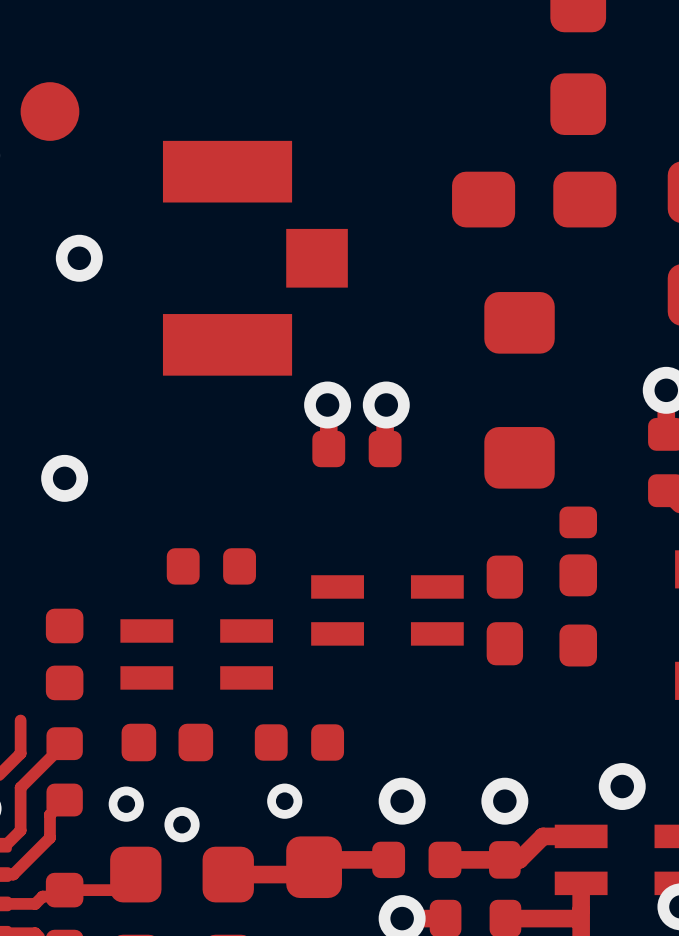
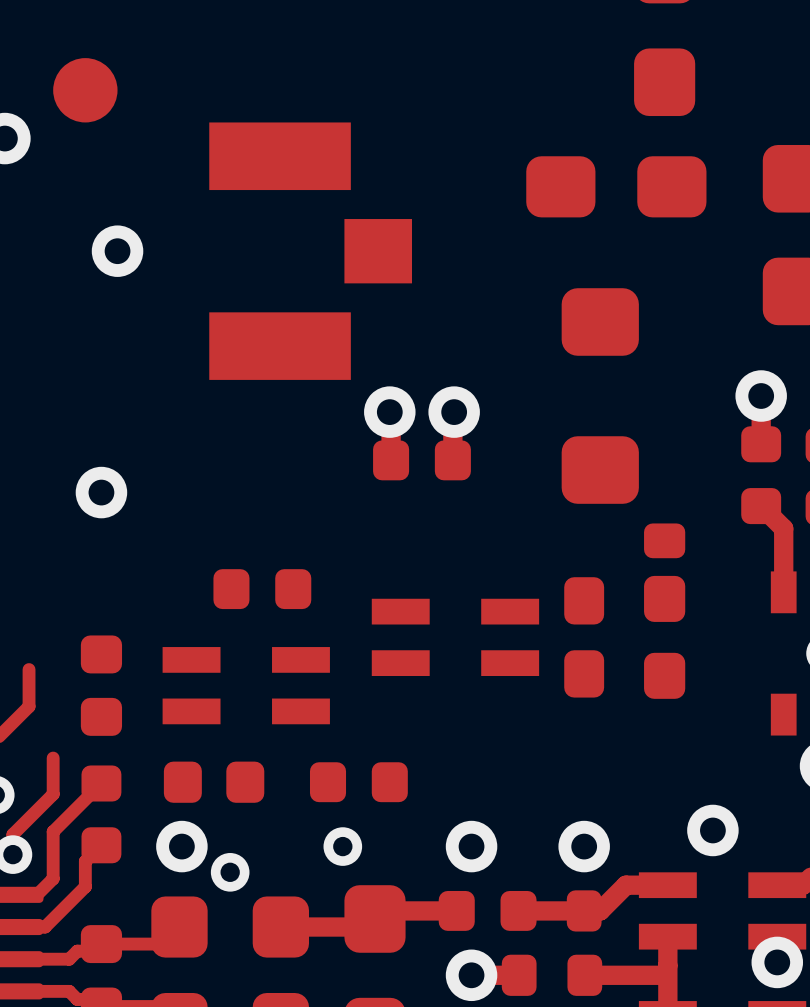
via size: [108, 786, 144, 822] -> [156, 820, 208, 873]

